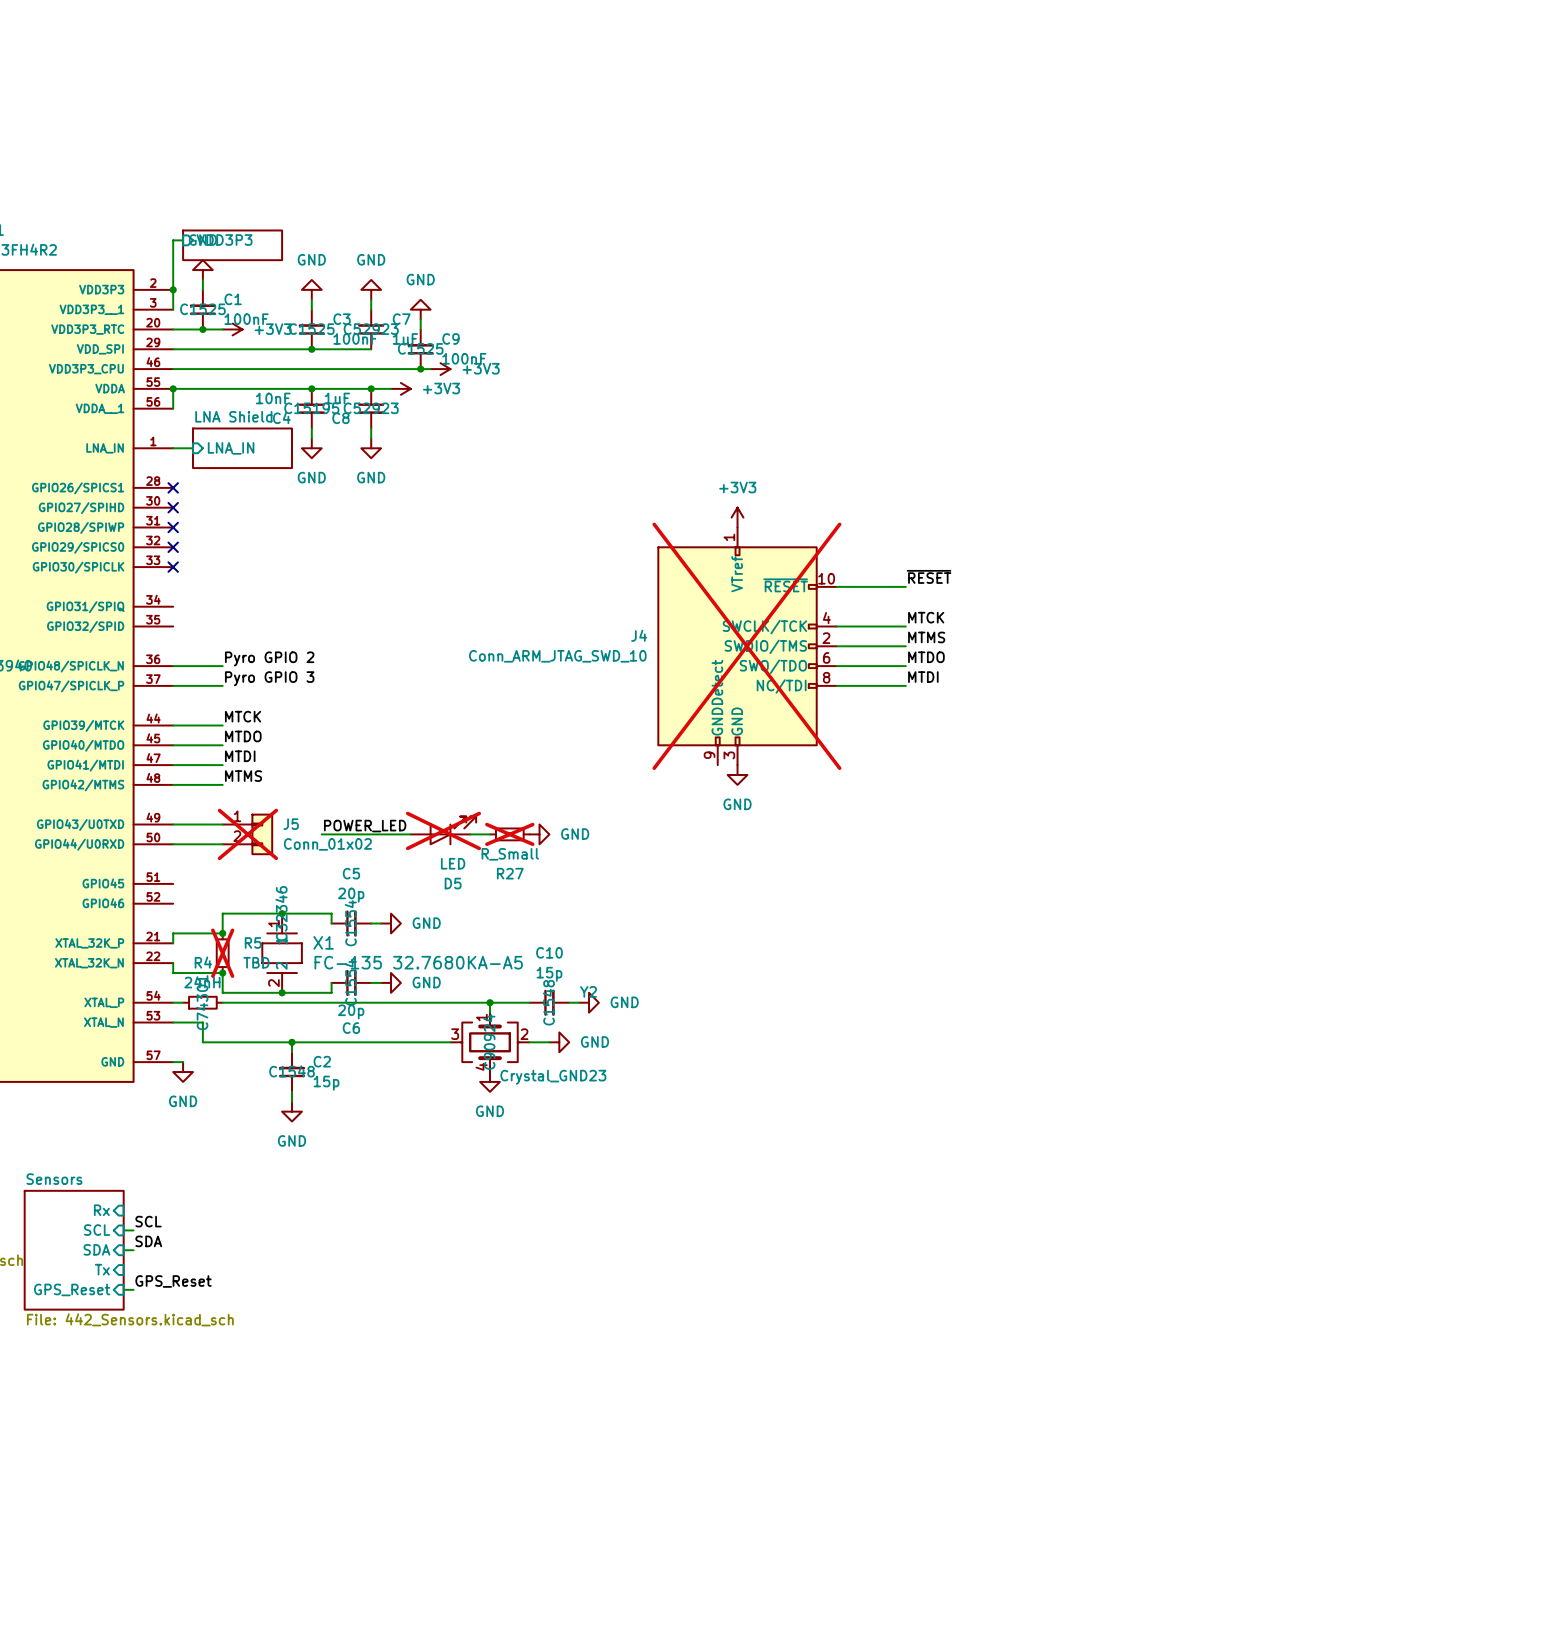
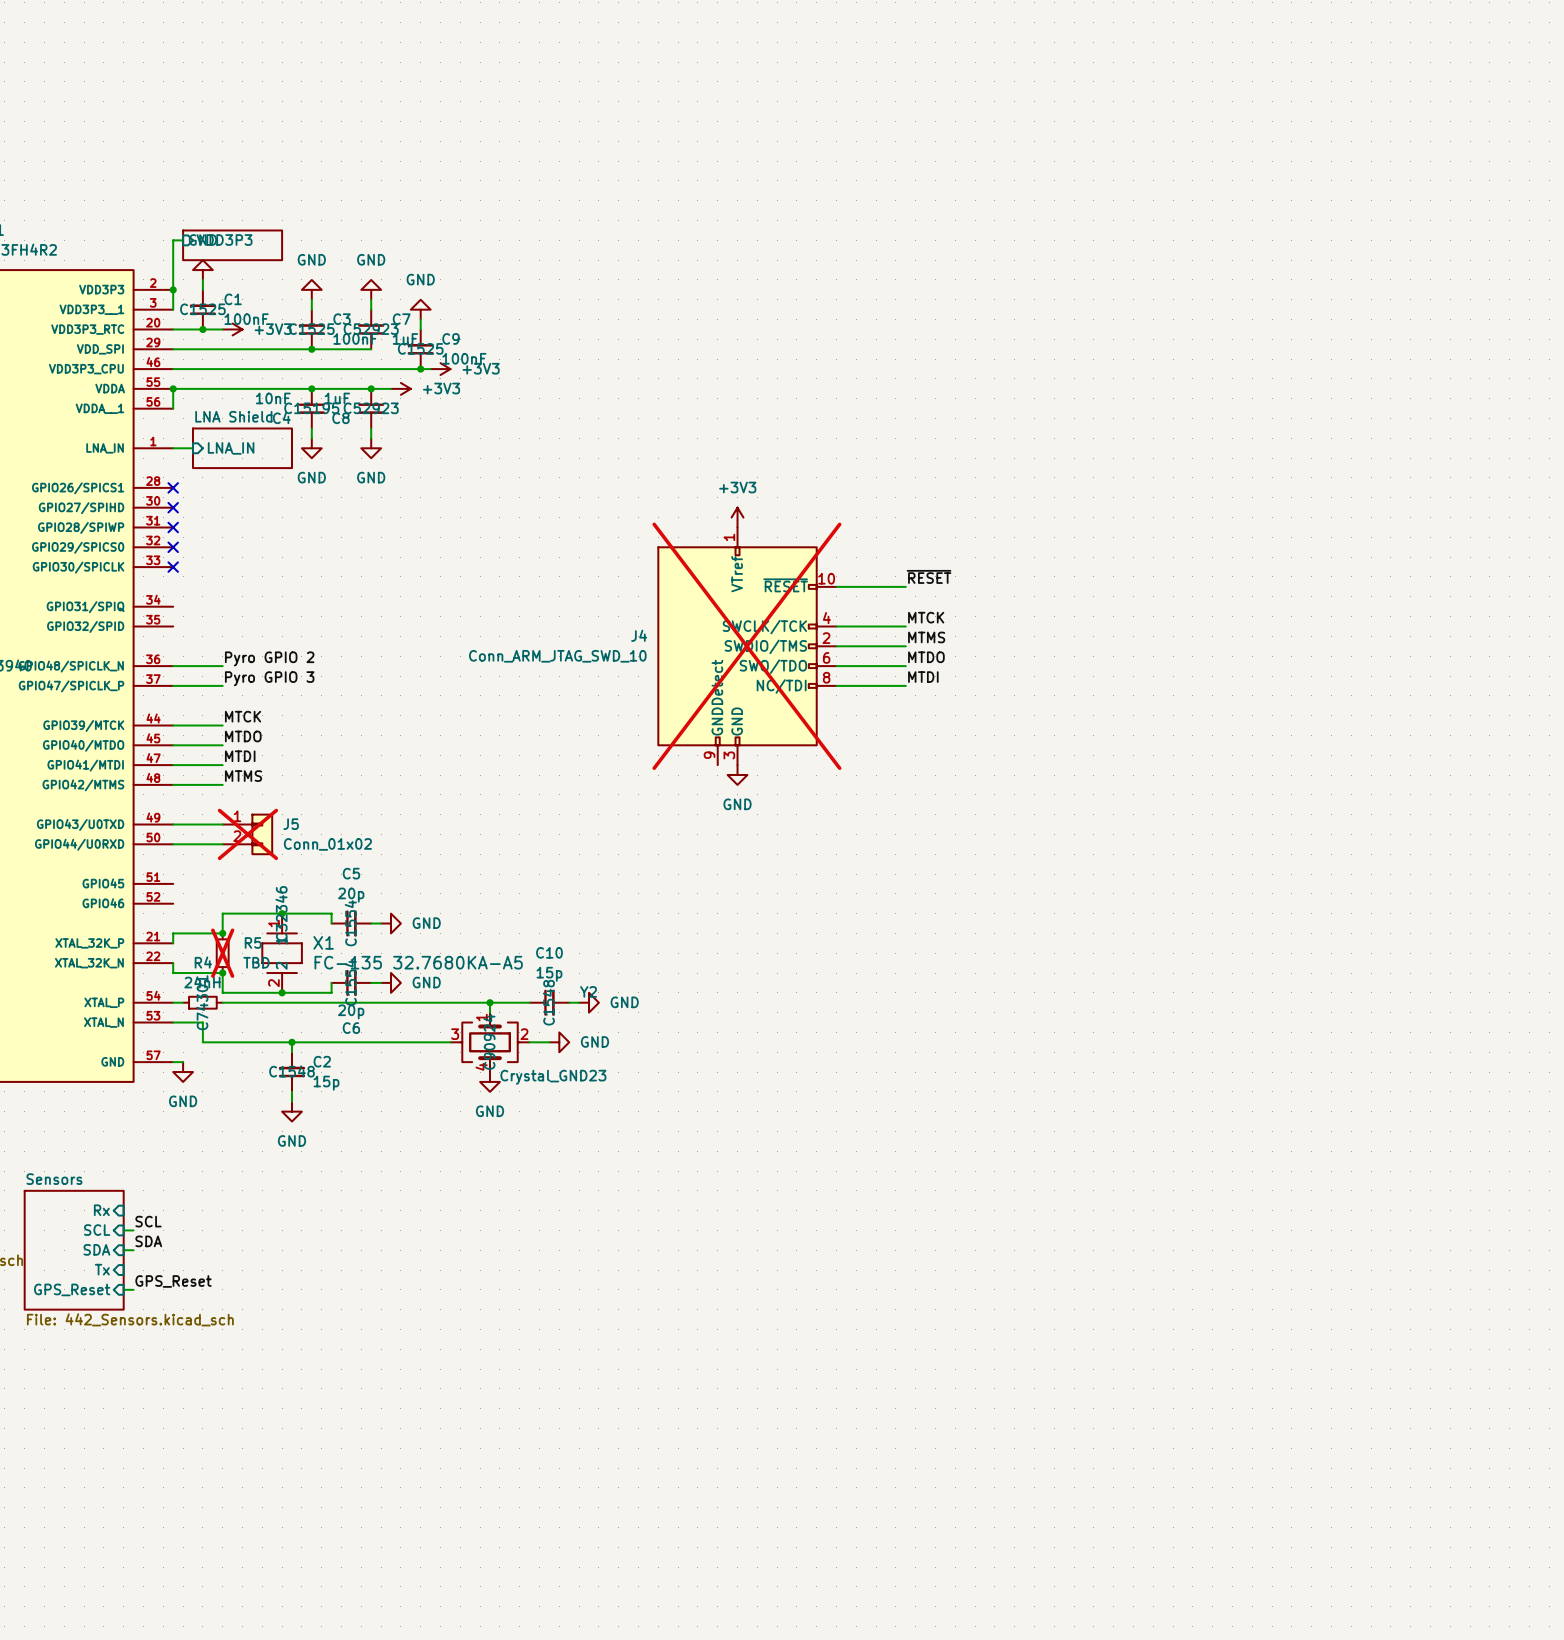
label: POWER_LED (365, 826) -> none
D5: LED (443, 830) -> none
wire: (321, 834) (410, 834) -> none
wire: (470, 834) (490, 834) -> none
R27: R_Small (509, 834) -> none
power symbol: GND (539, 834) -> none

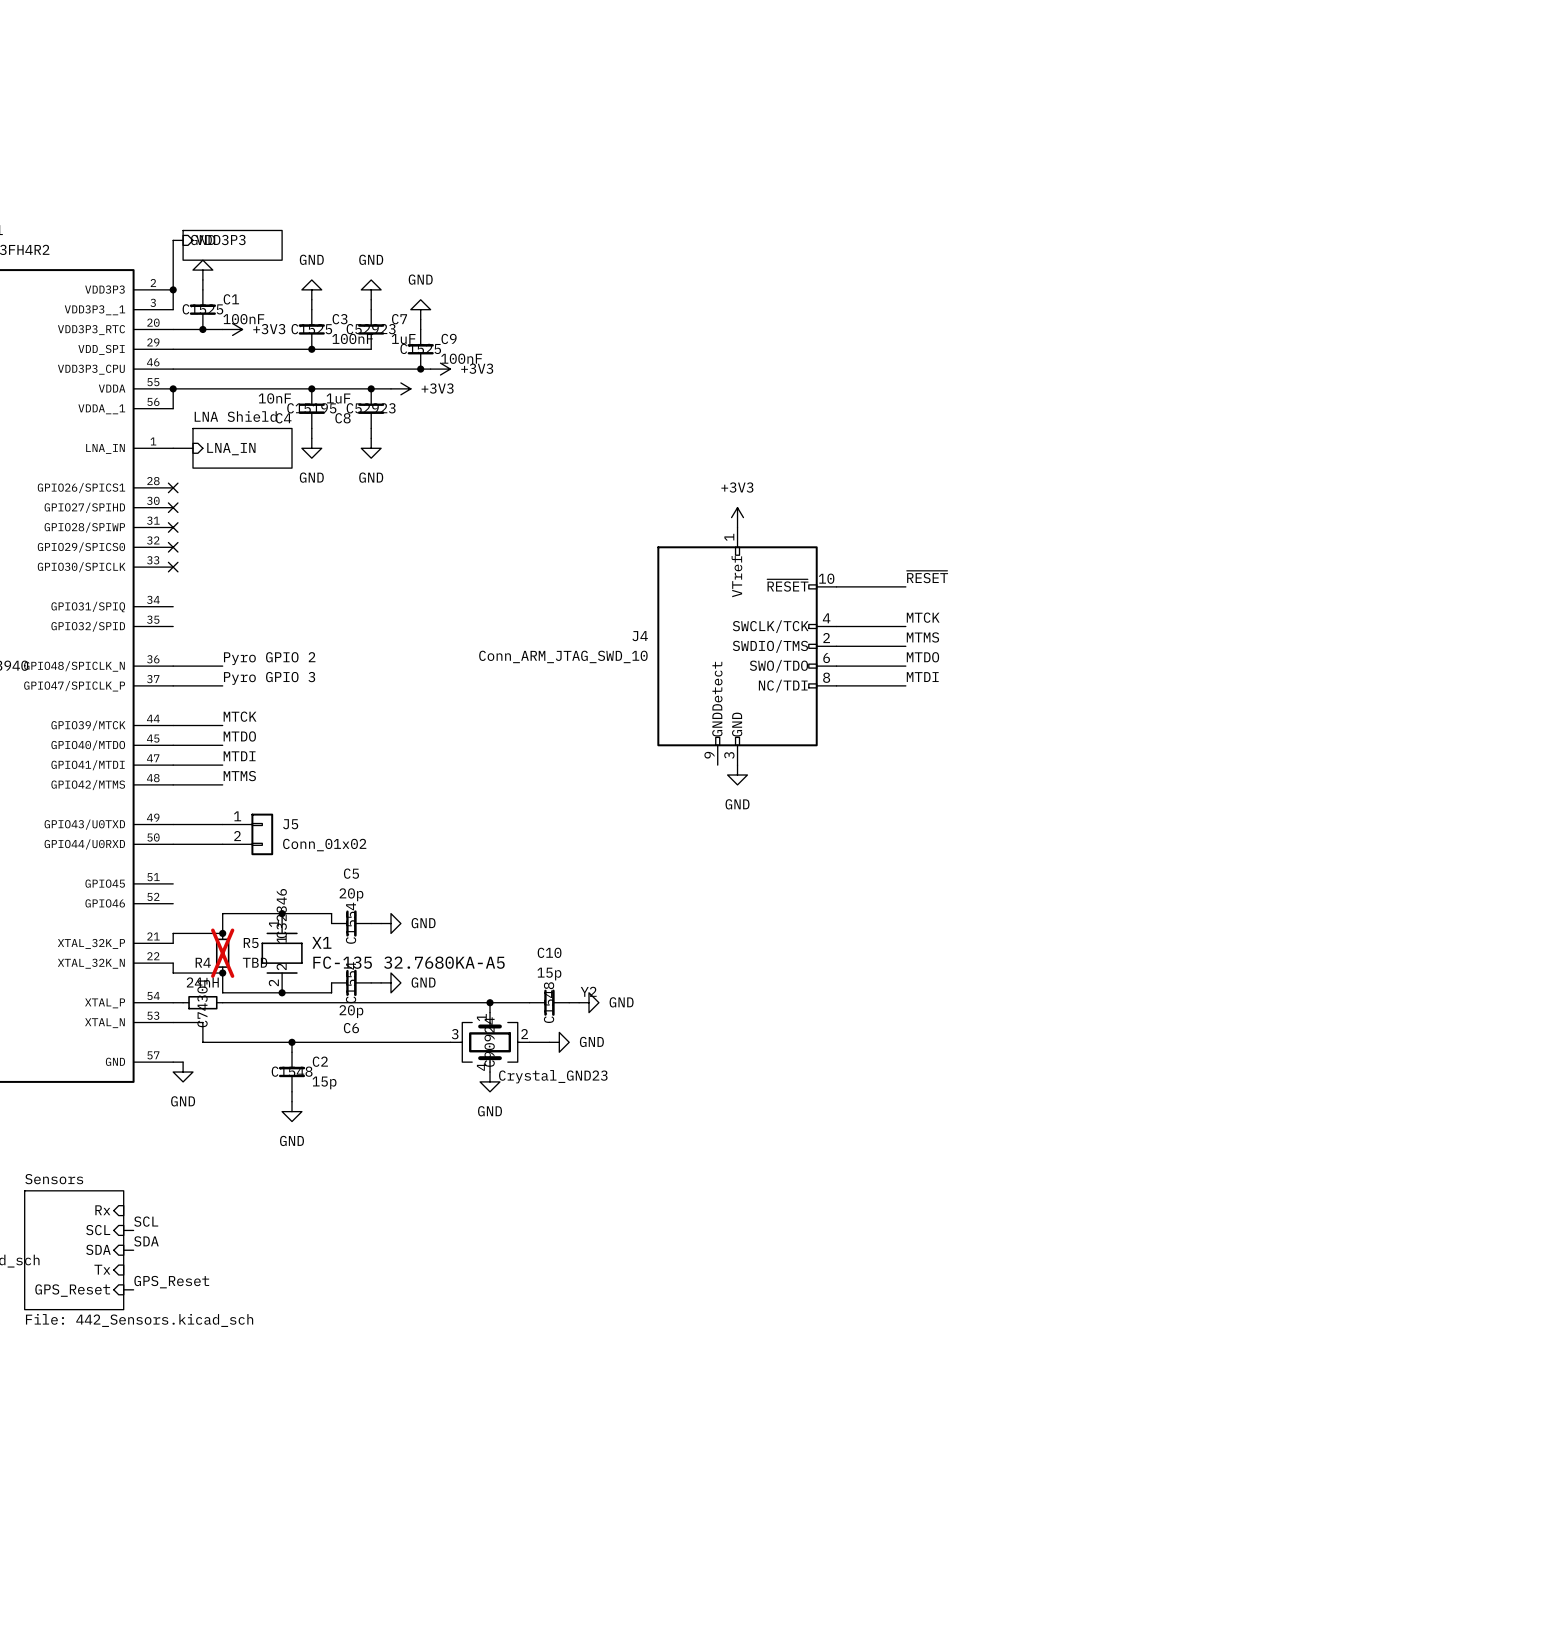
J4 do-not-place cross: (746, 646) -> none
J5 do-not-place cross: (247, 834) -> none

